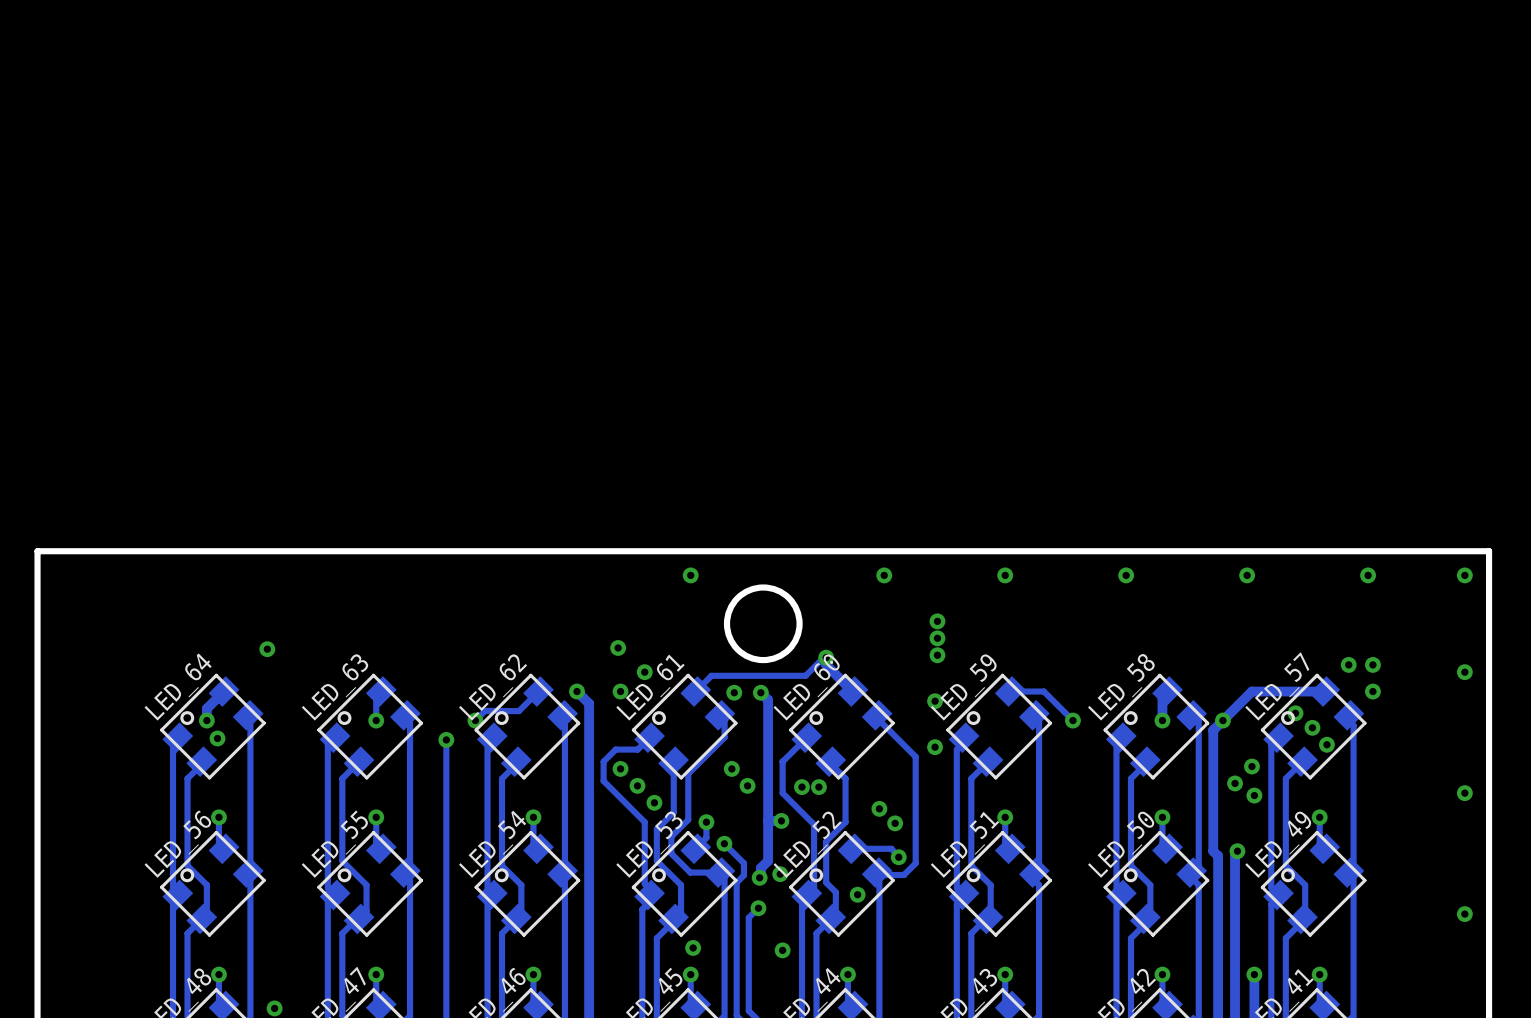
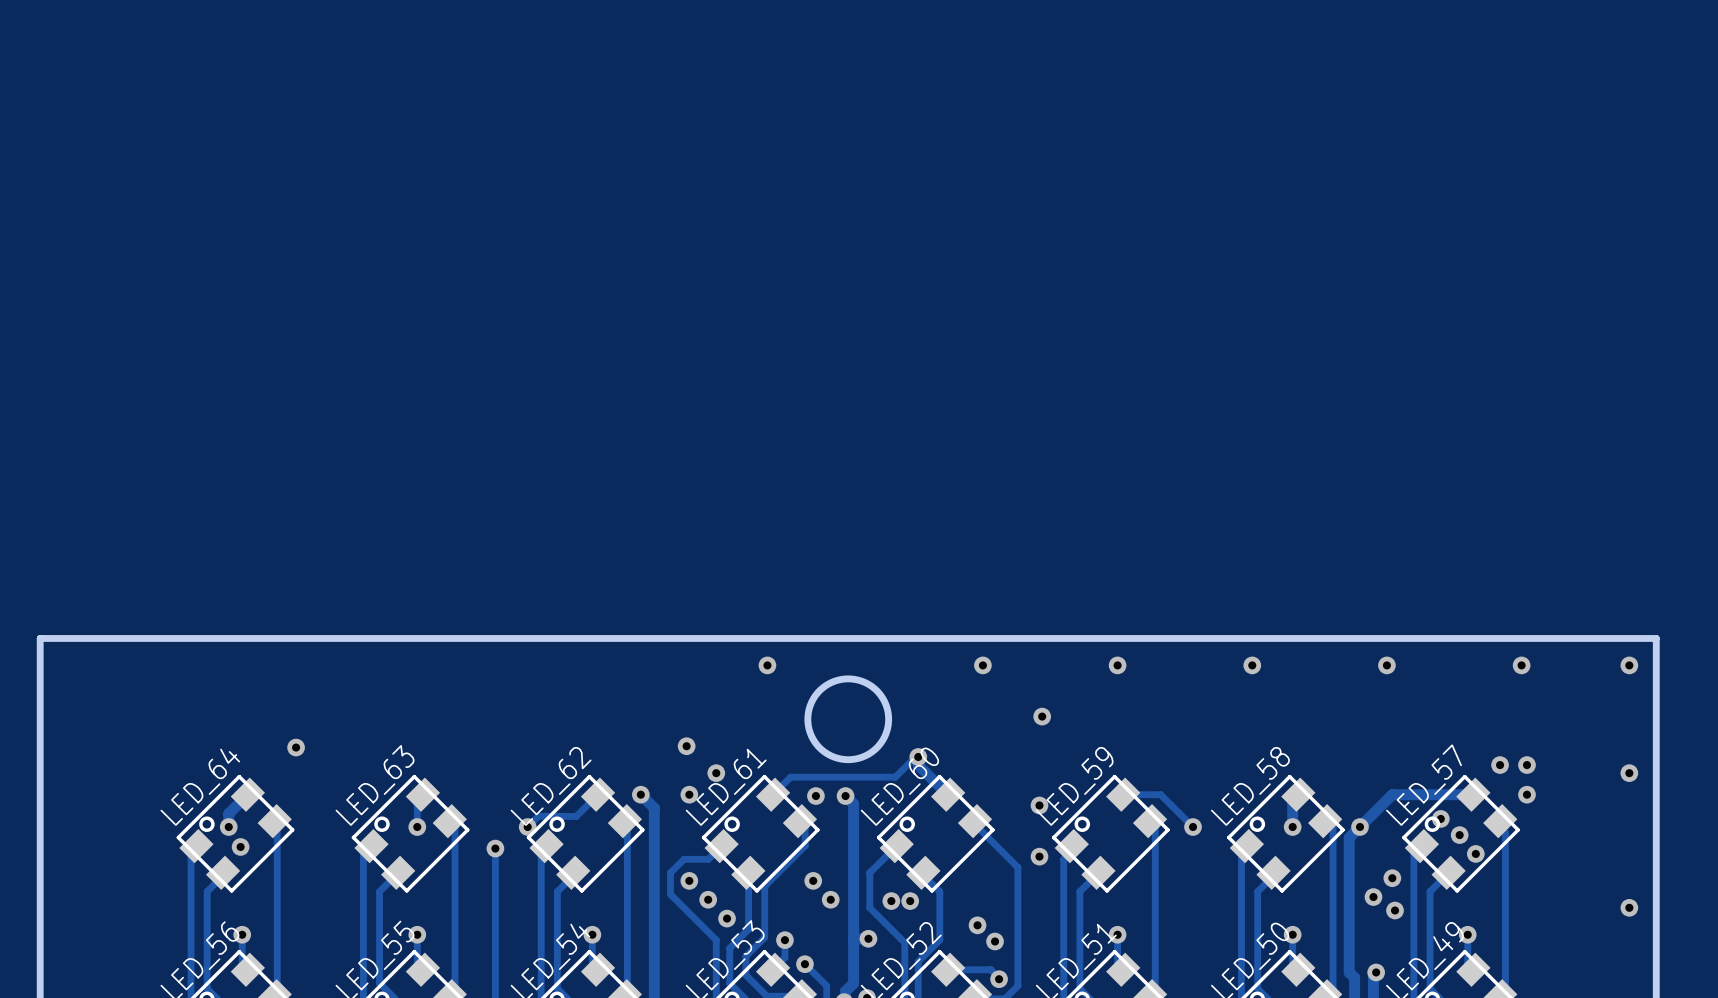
via: (937, 638) -> none
via: (937, 655) -> none

